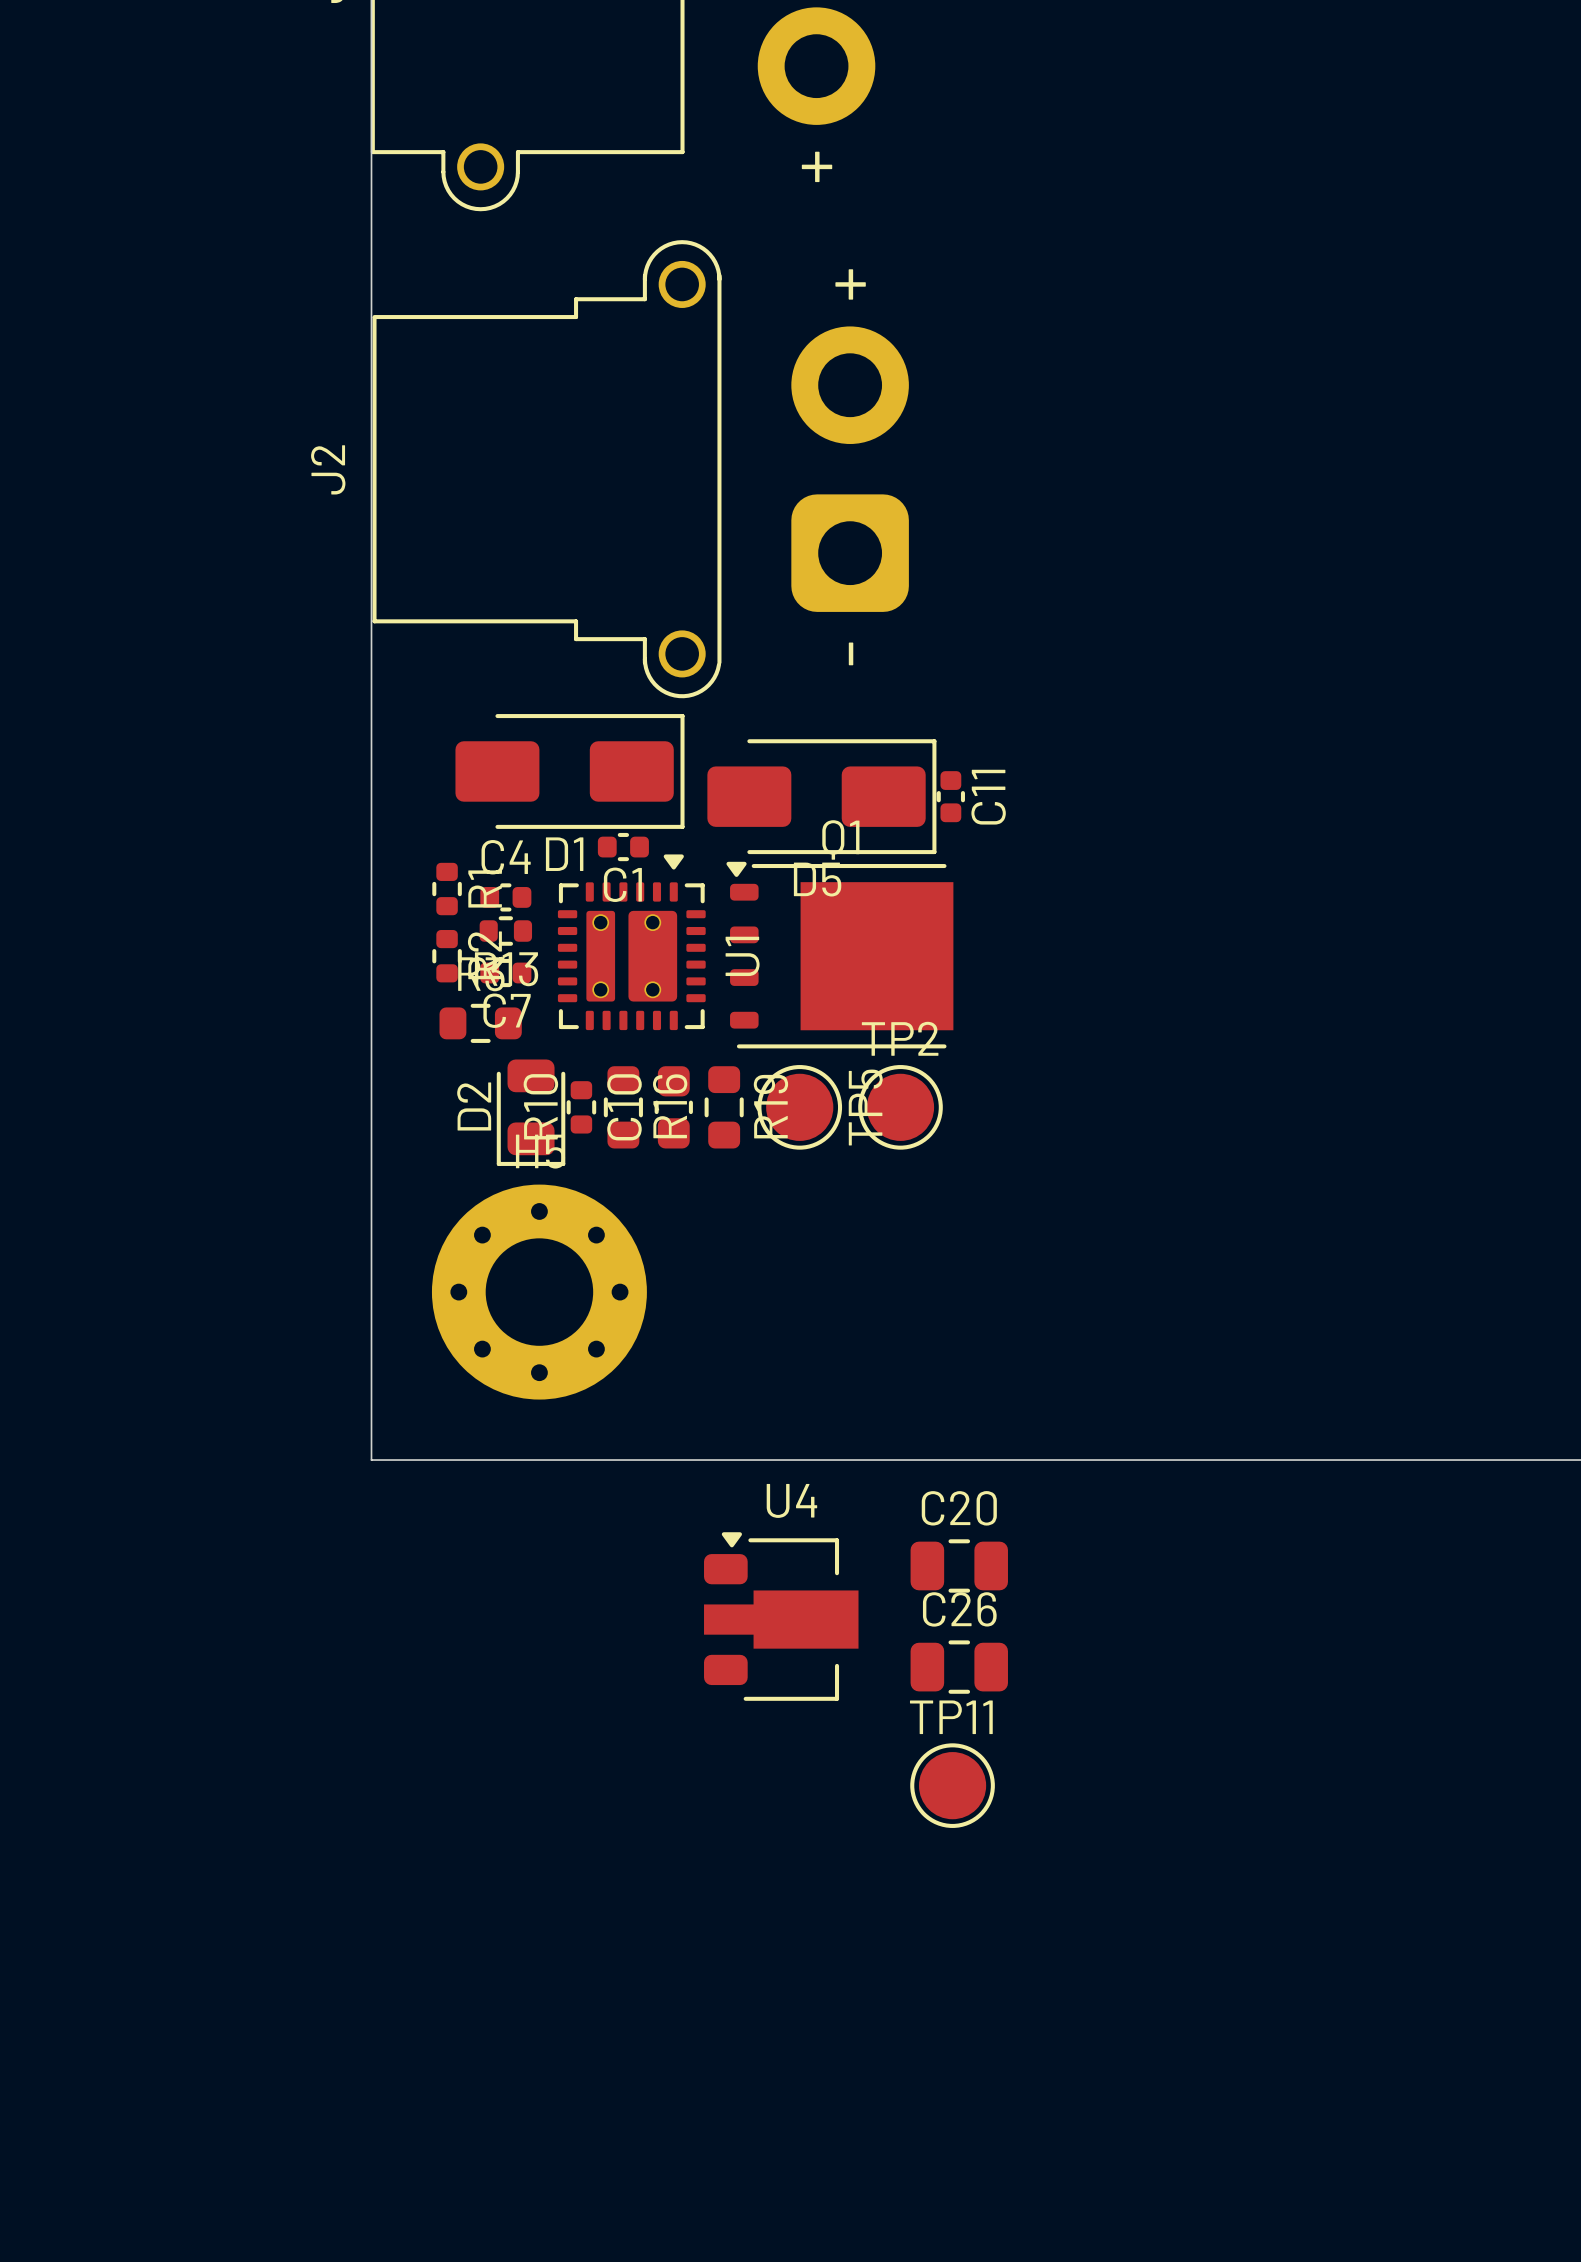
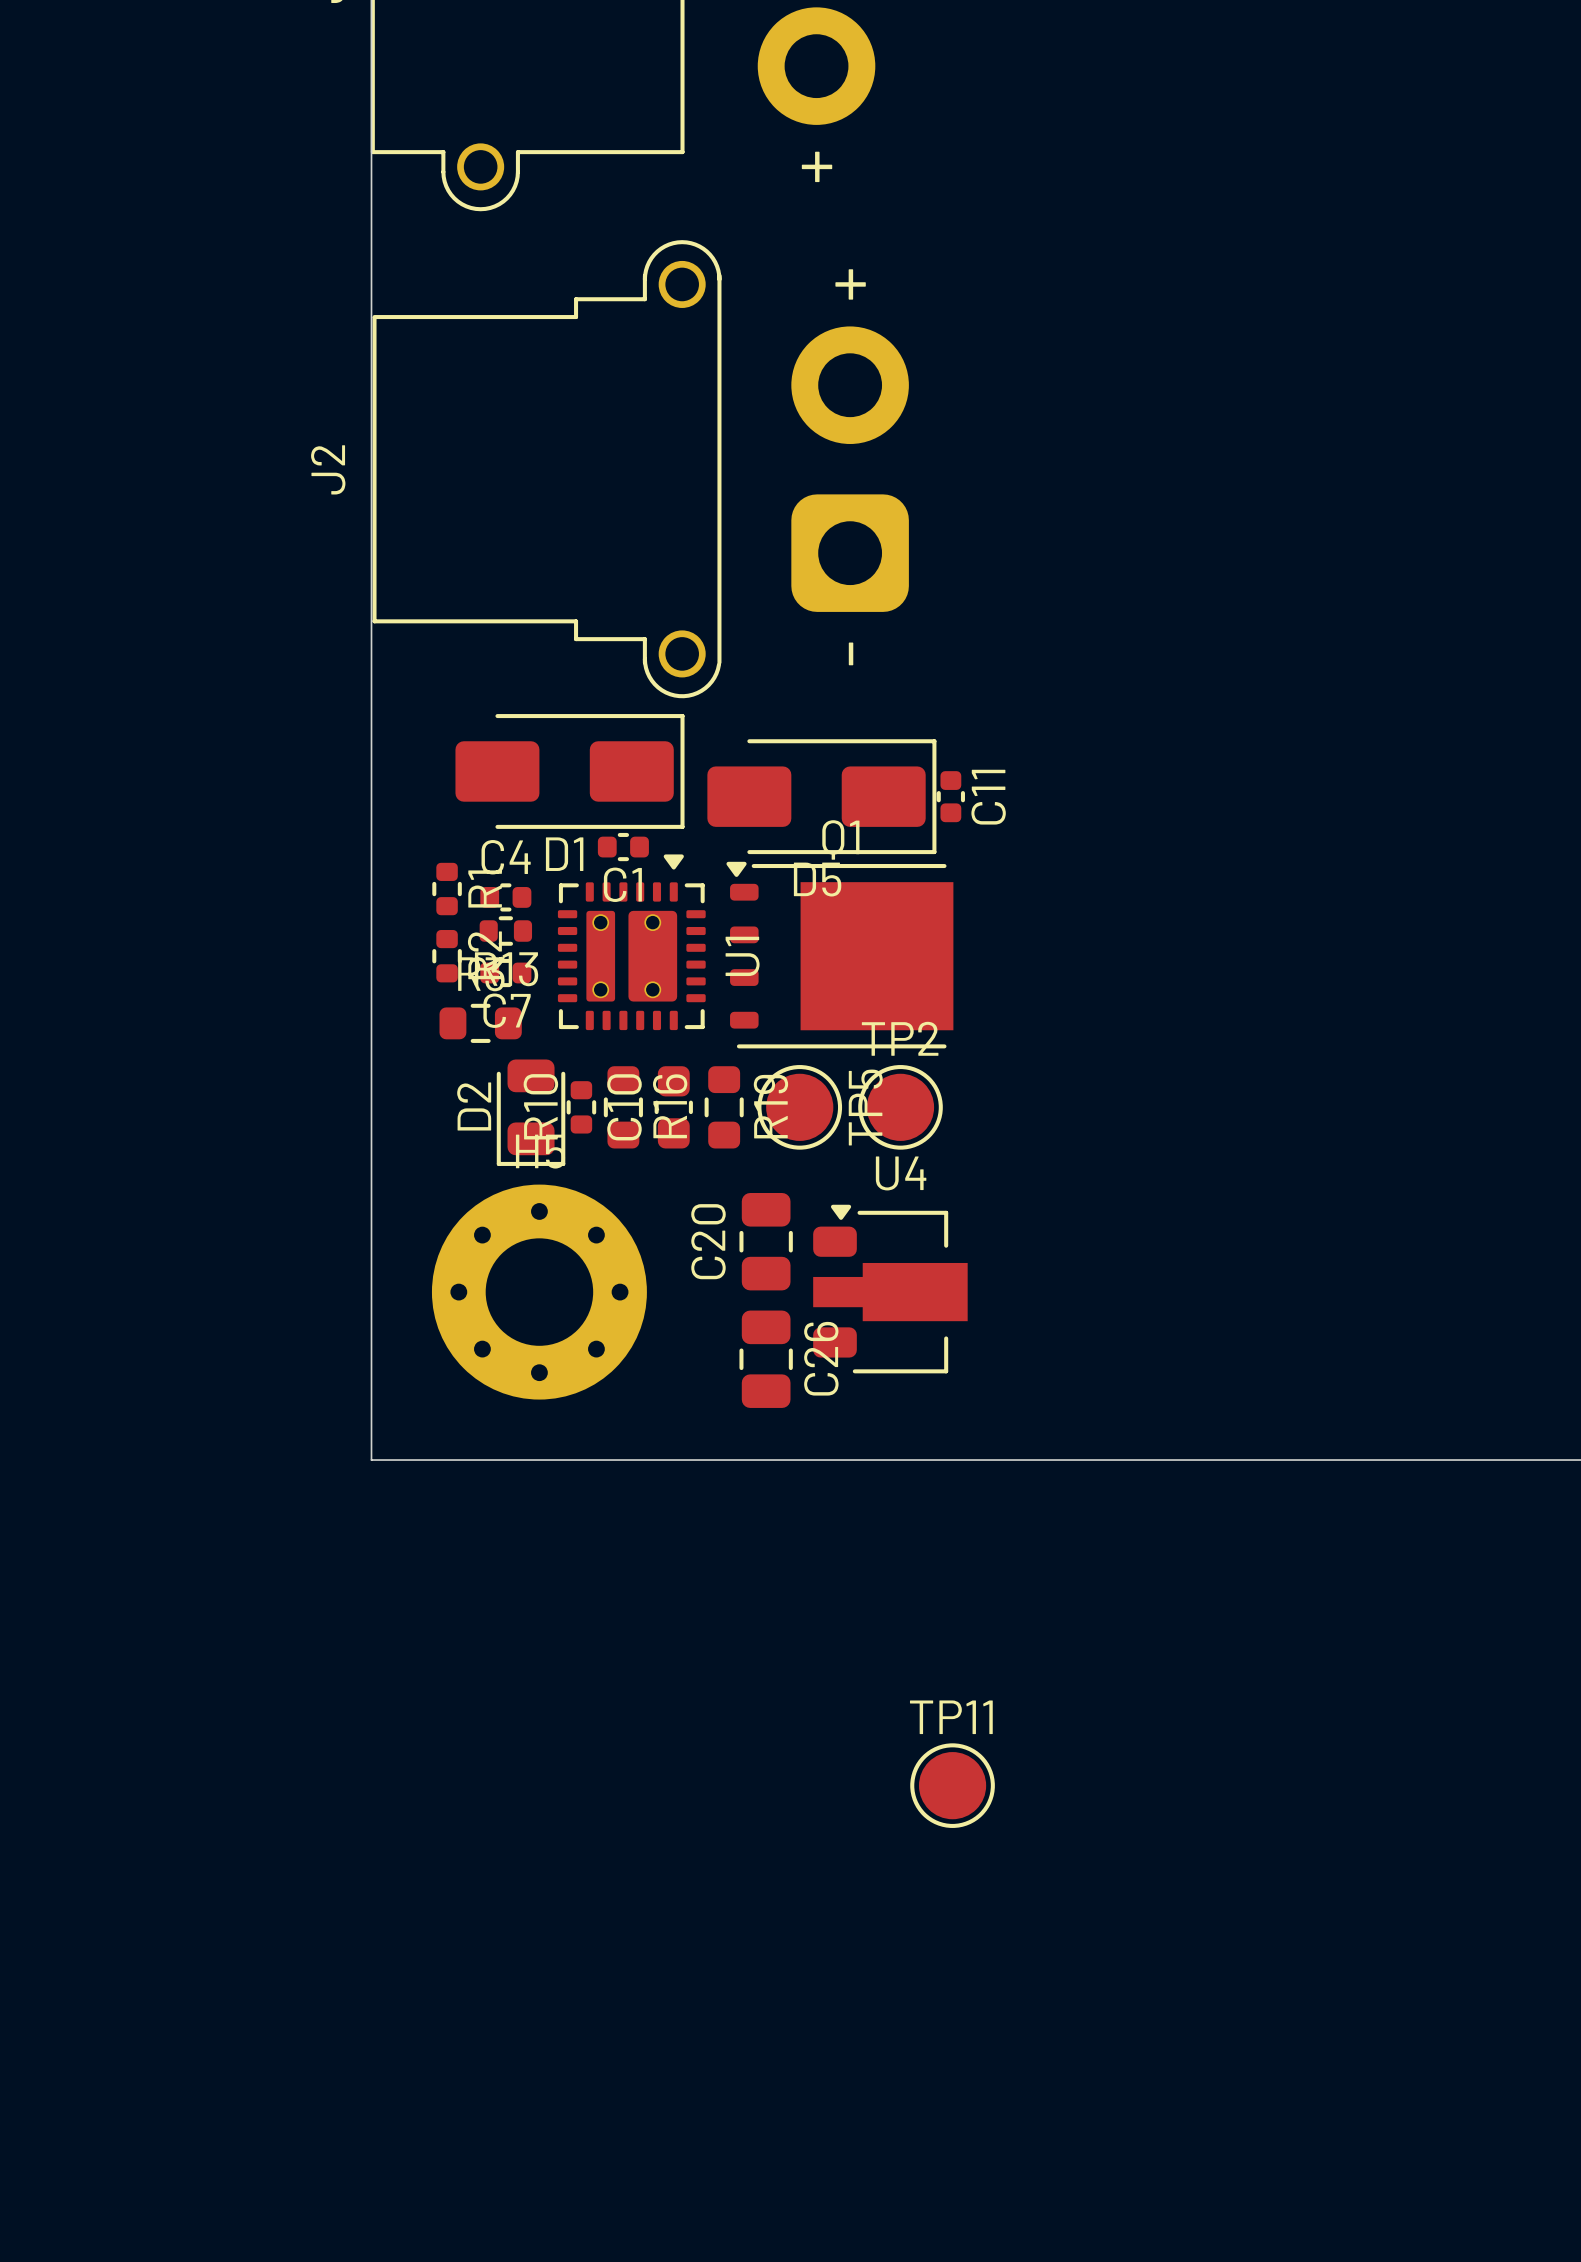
C20 name position: C20 (959, 1508) -> C20 (708, 1241)
C20 rotation: 0° (959, 1565) -> 90° clockwise (766, 1241)
C20 position: (959, 1565) -> (766, 1241)
U4 position: (781, 1616) -> (890, 1289)
C26 rotation: 0° (959, 1667) -> 90° clockwise (766, 1359)
C26 position: (959, 1667) -> (766, 1359)

